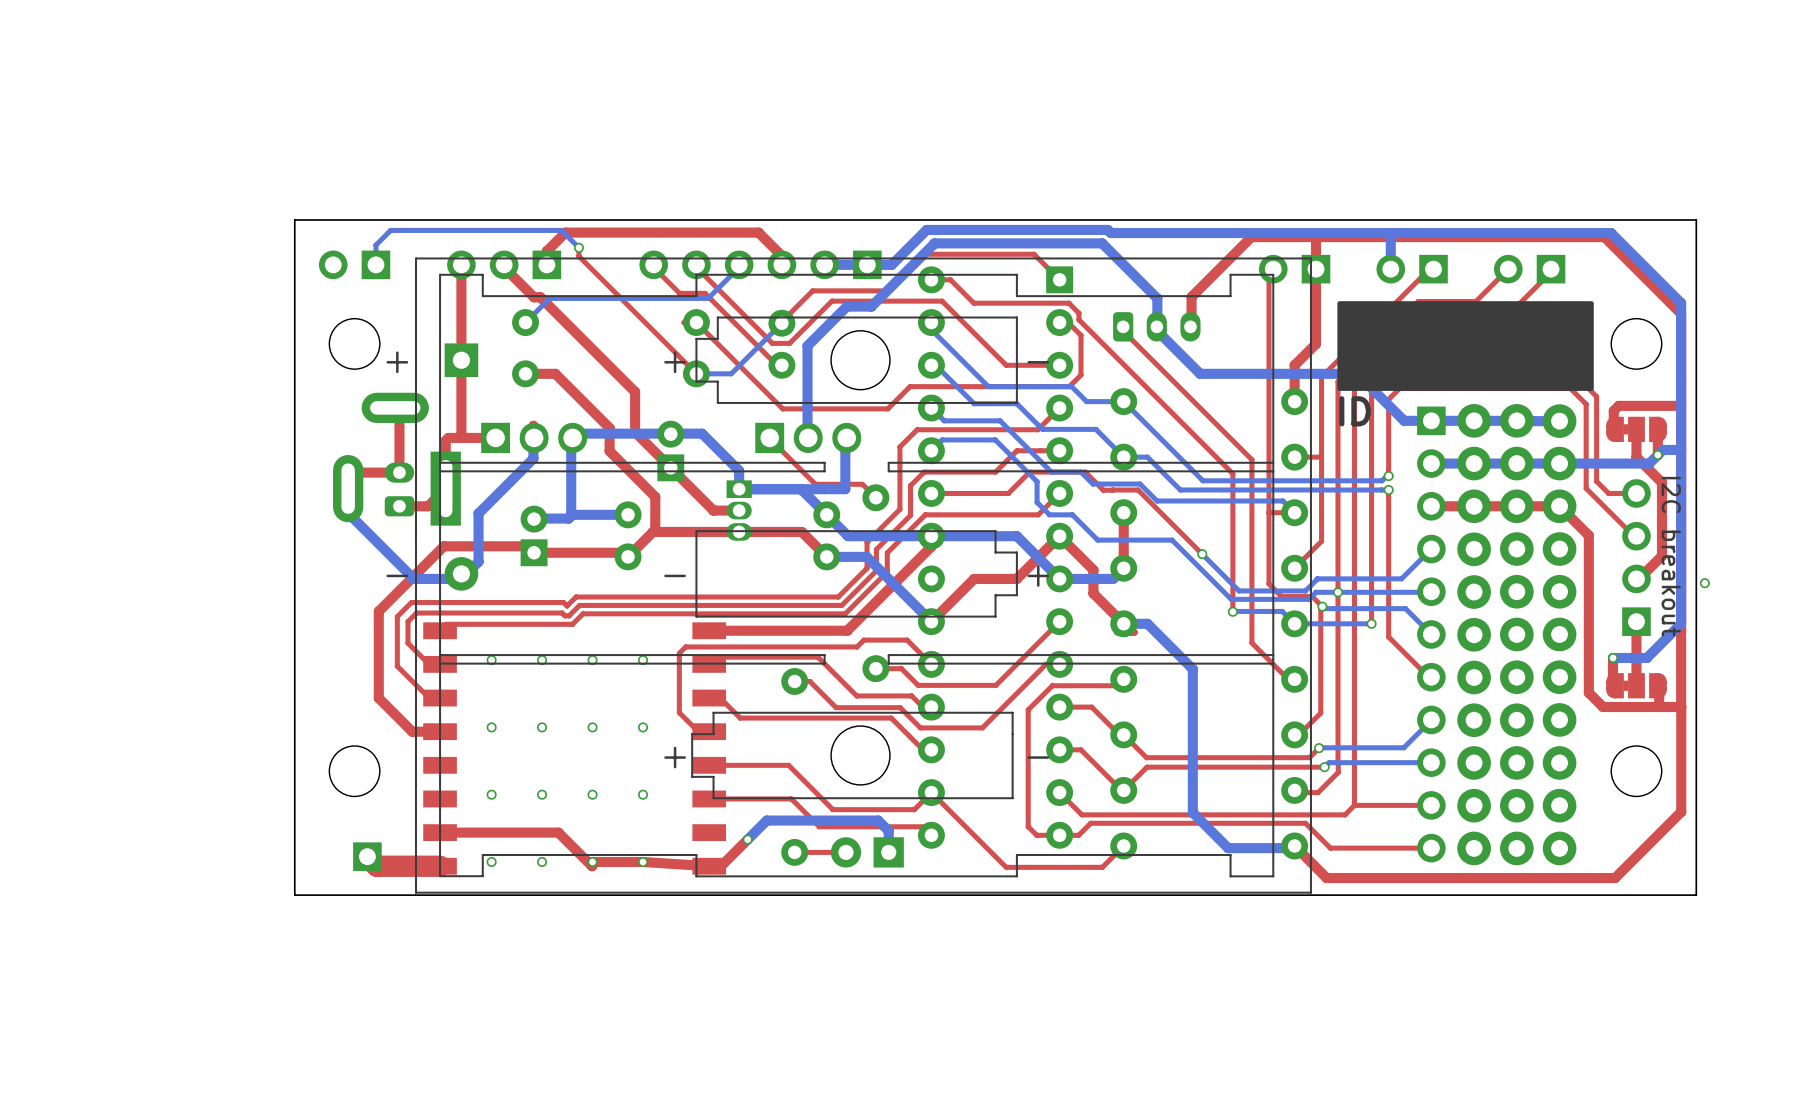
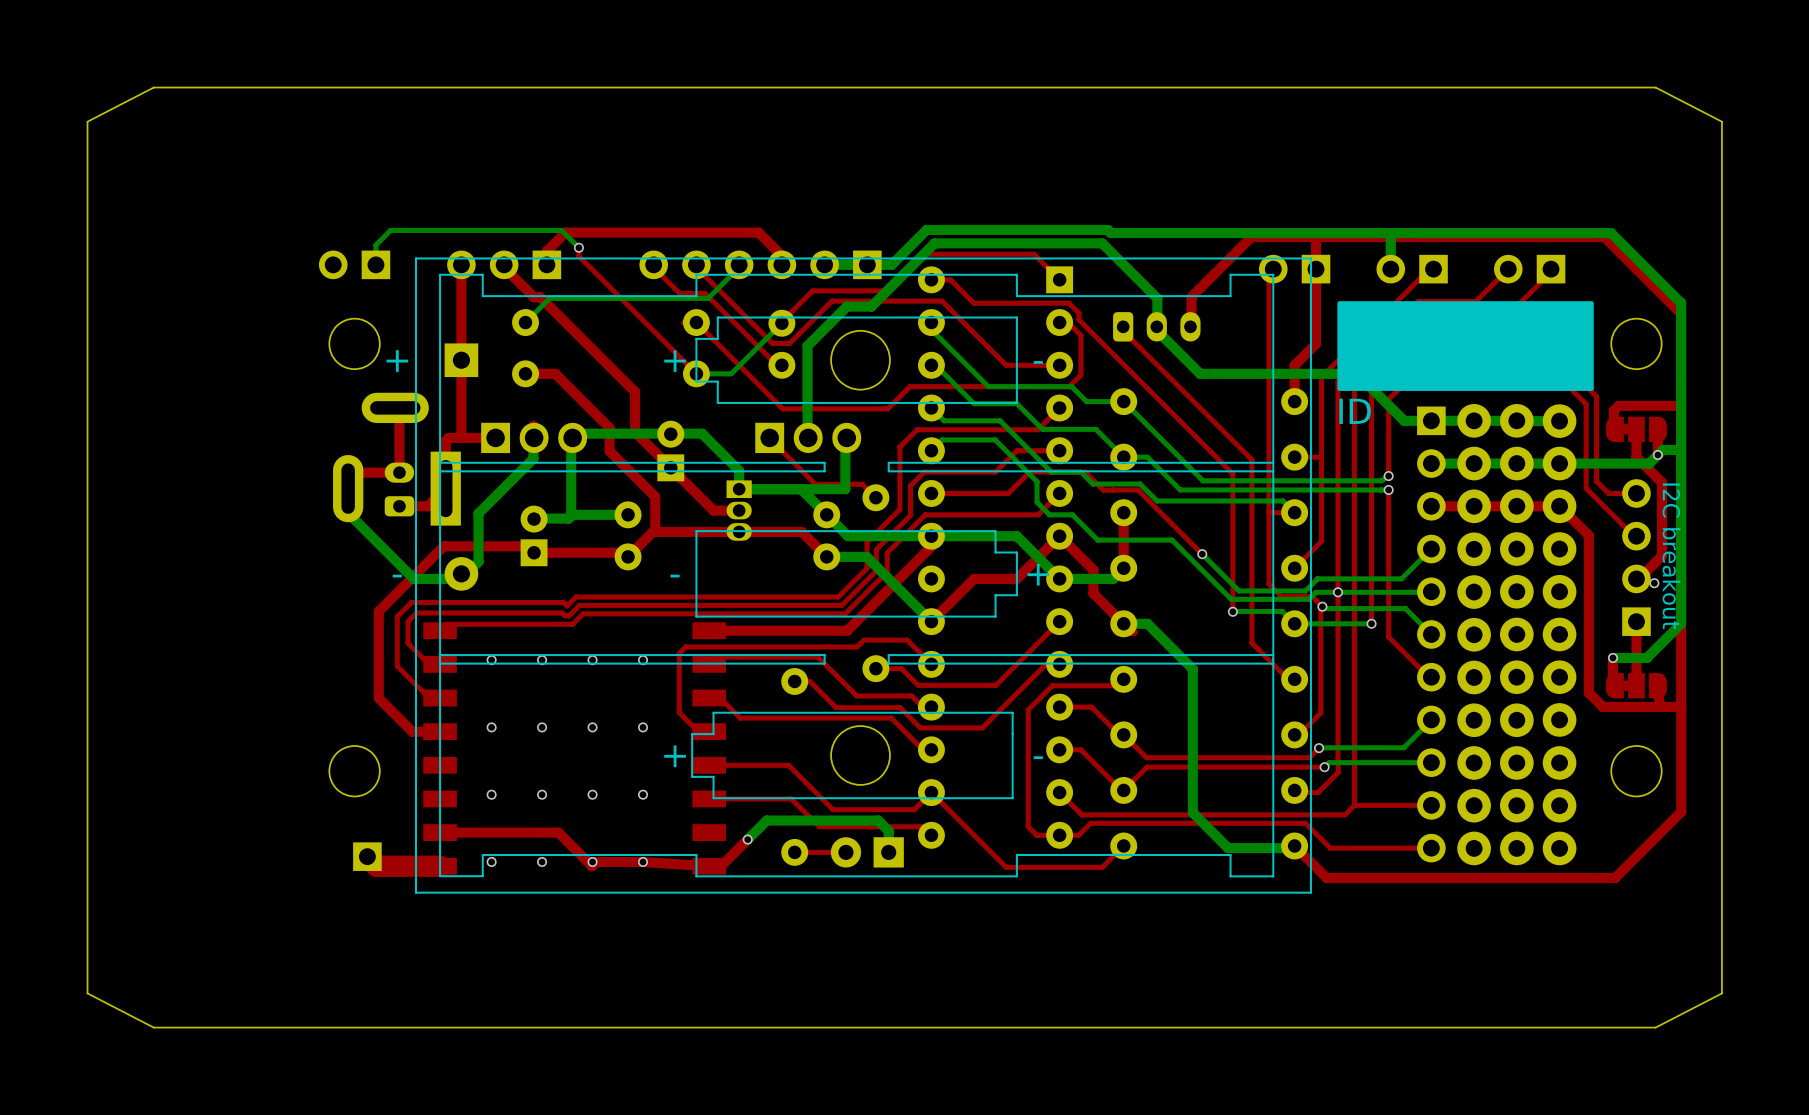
board edge: (1696, 220) (294, 220) (294, 895) (1696, 895) (1696, 220) -> (1655, 87) (1721, 121) (1721, 993) (1655, 1027) (153, 1027) (87, 993) (87, 121) (153, 87) (1655, 87)
via position: (1704, 583) -> (1654, 583)

